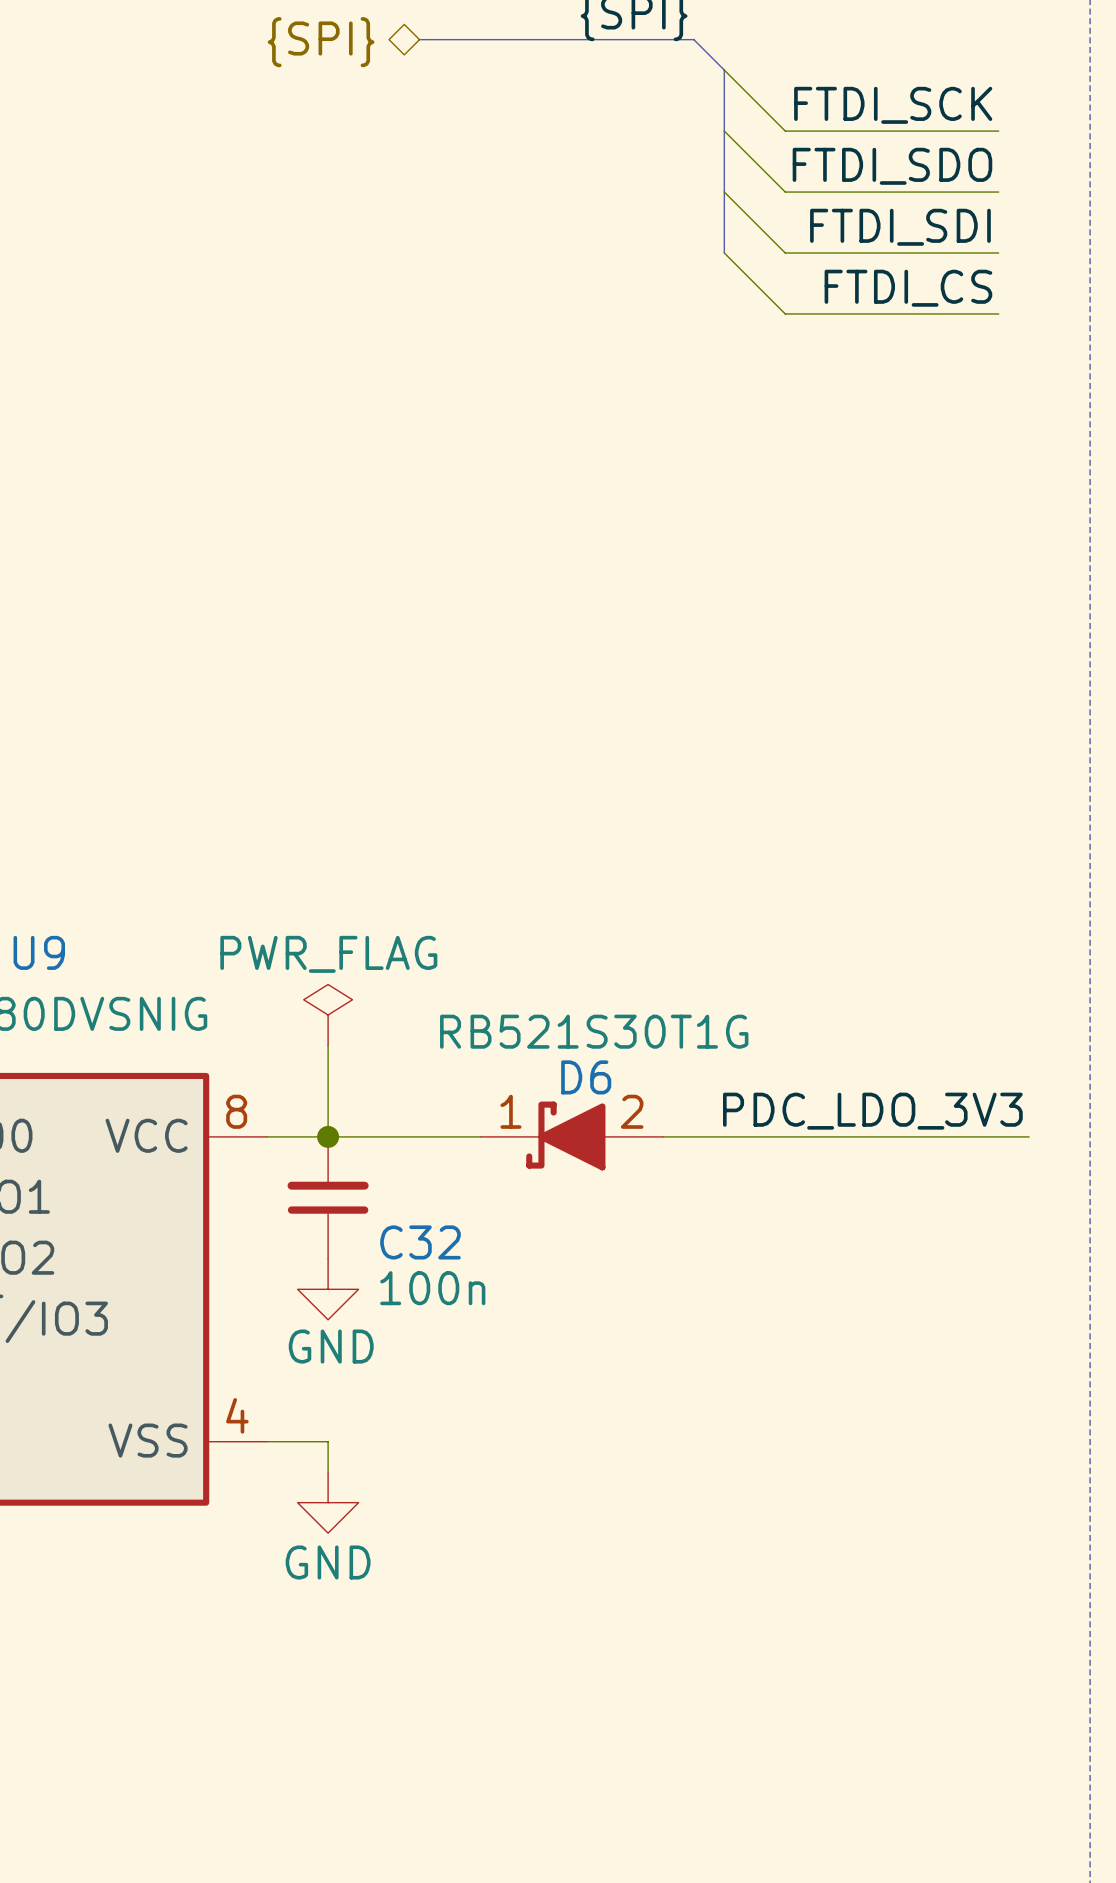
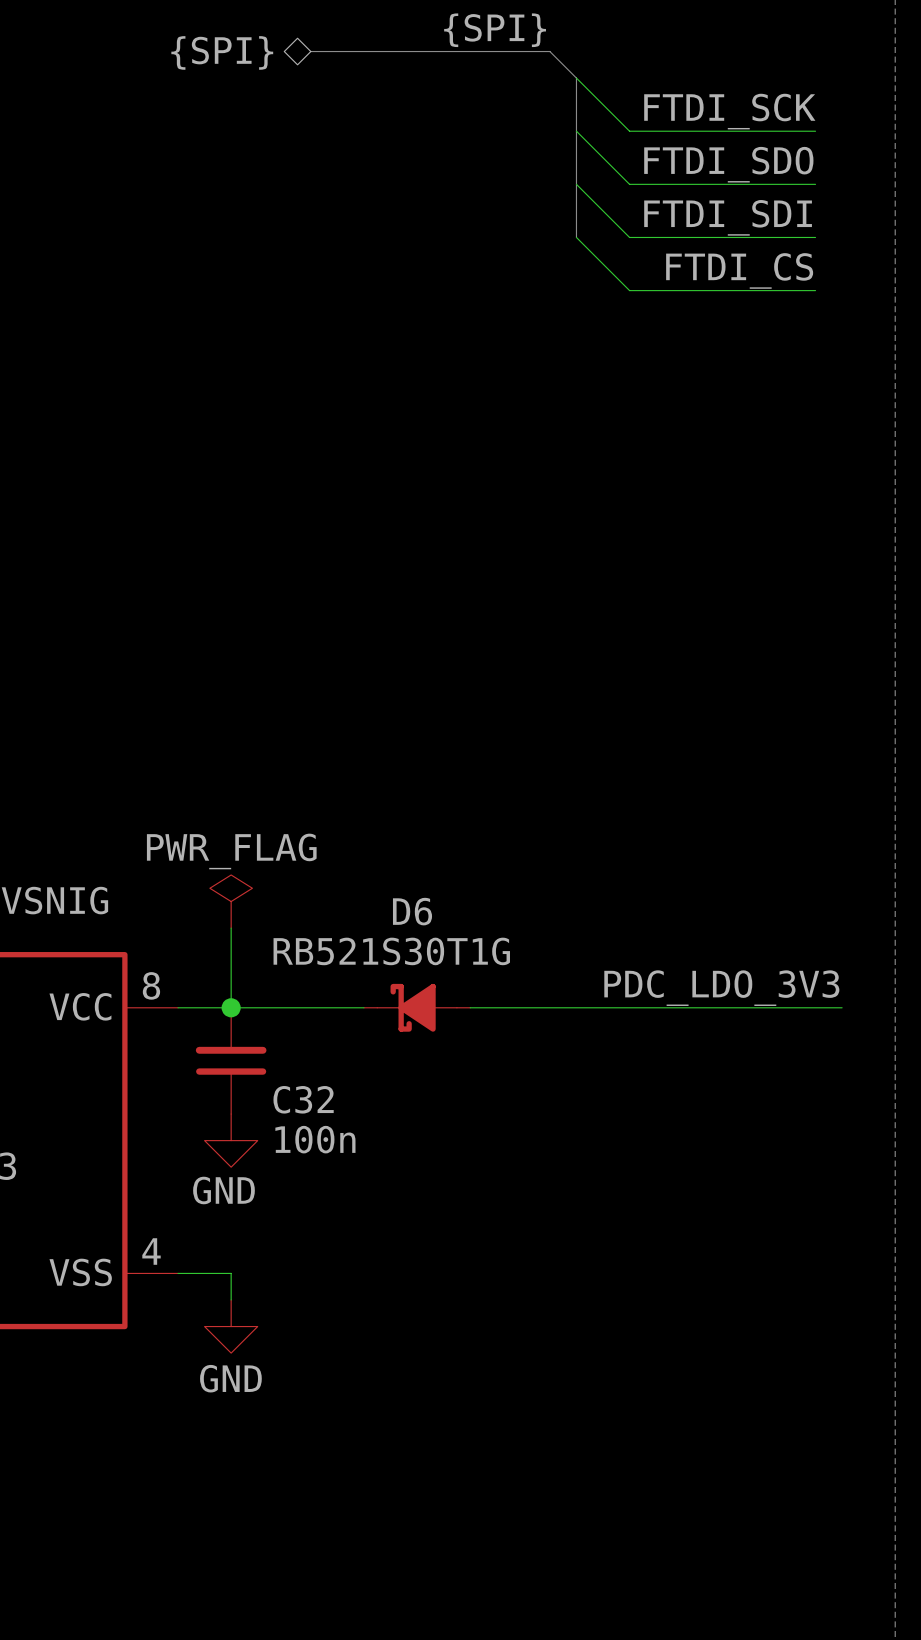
D6 name position: D6 (586, 1077) -> D6 (412, 911)
D6 symbol: [480, 1101, 664, 1171] -> [363, 983, 471, 1032]

